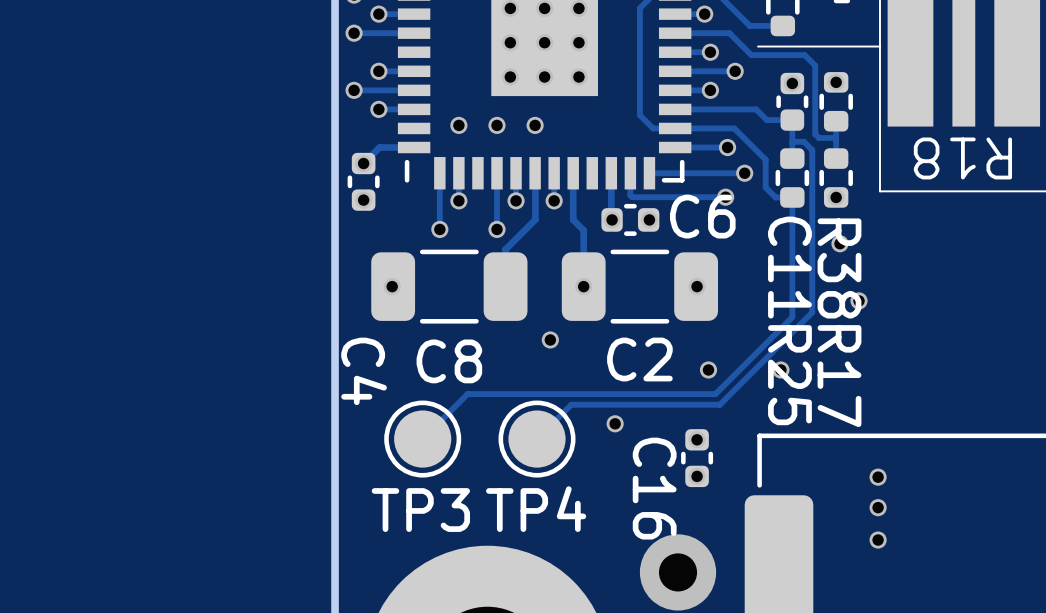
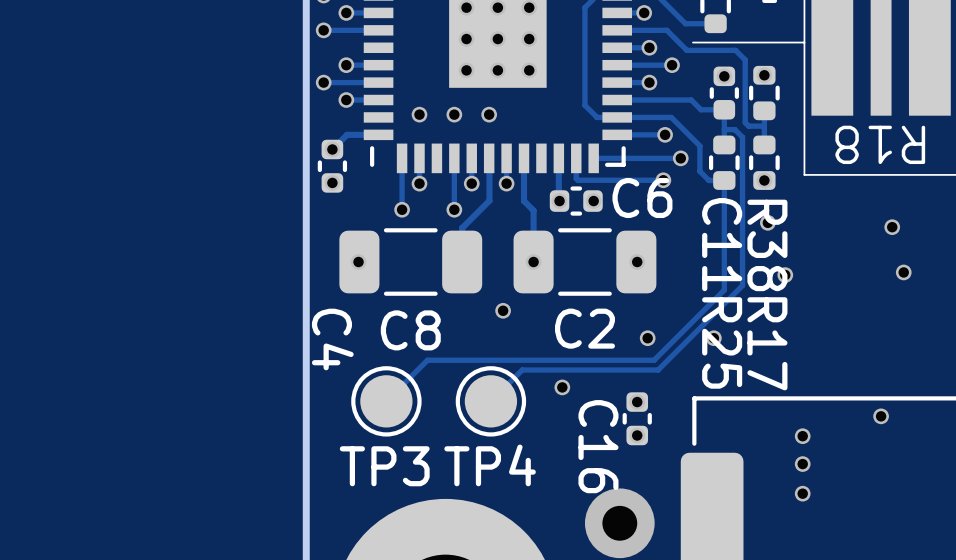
via: none -> (892, 227)
via: none -> (903, 272)
via: none -> (881, 416)

